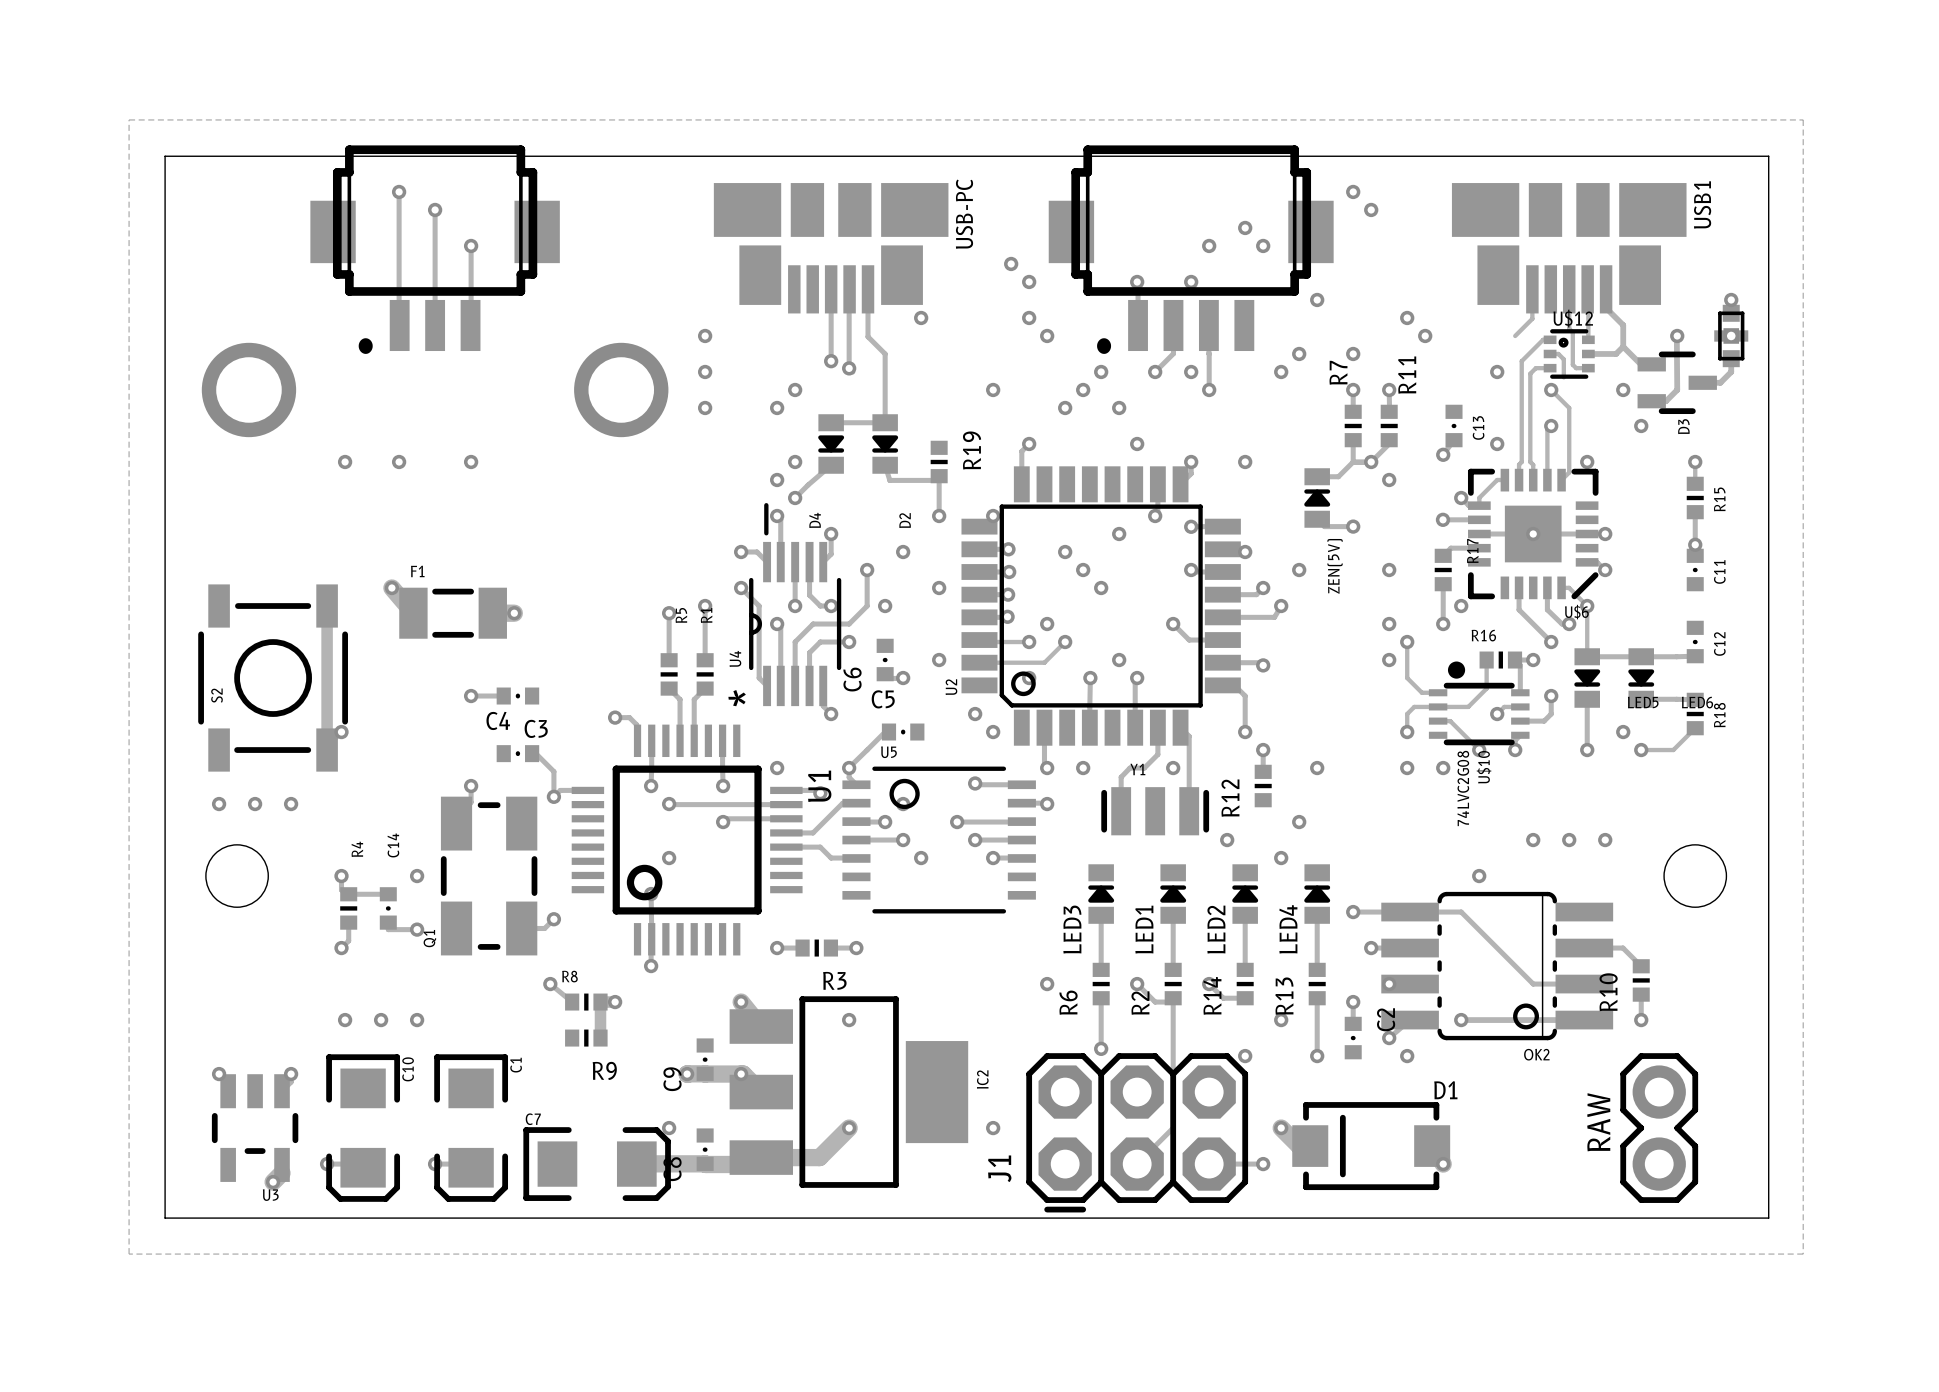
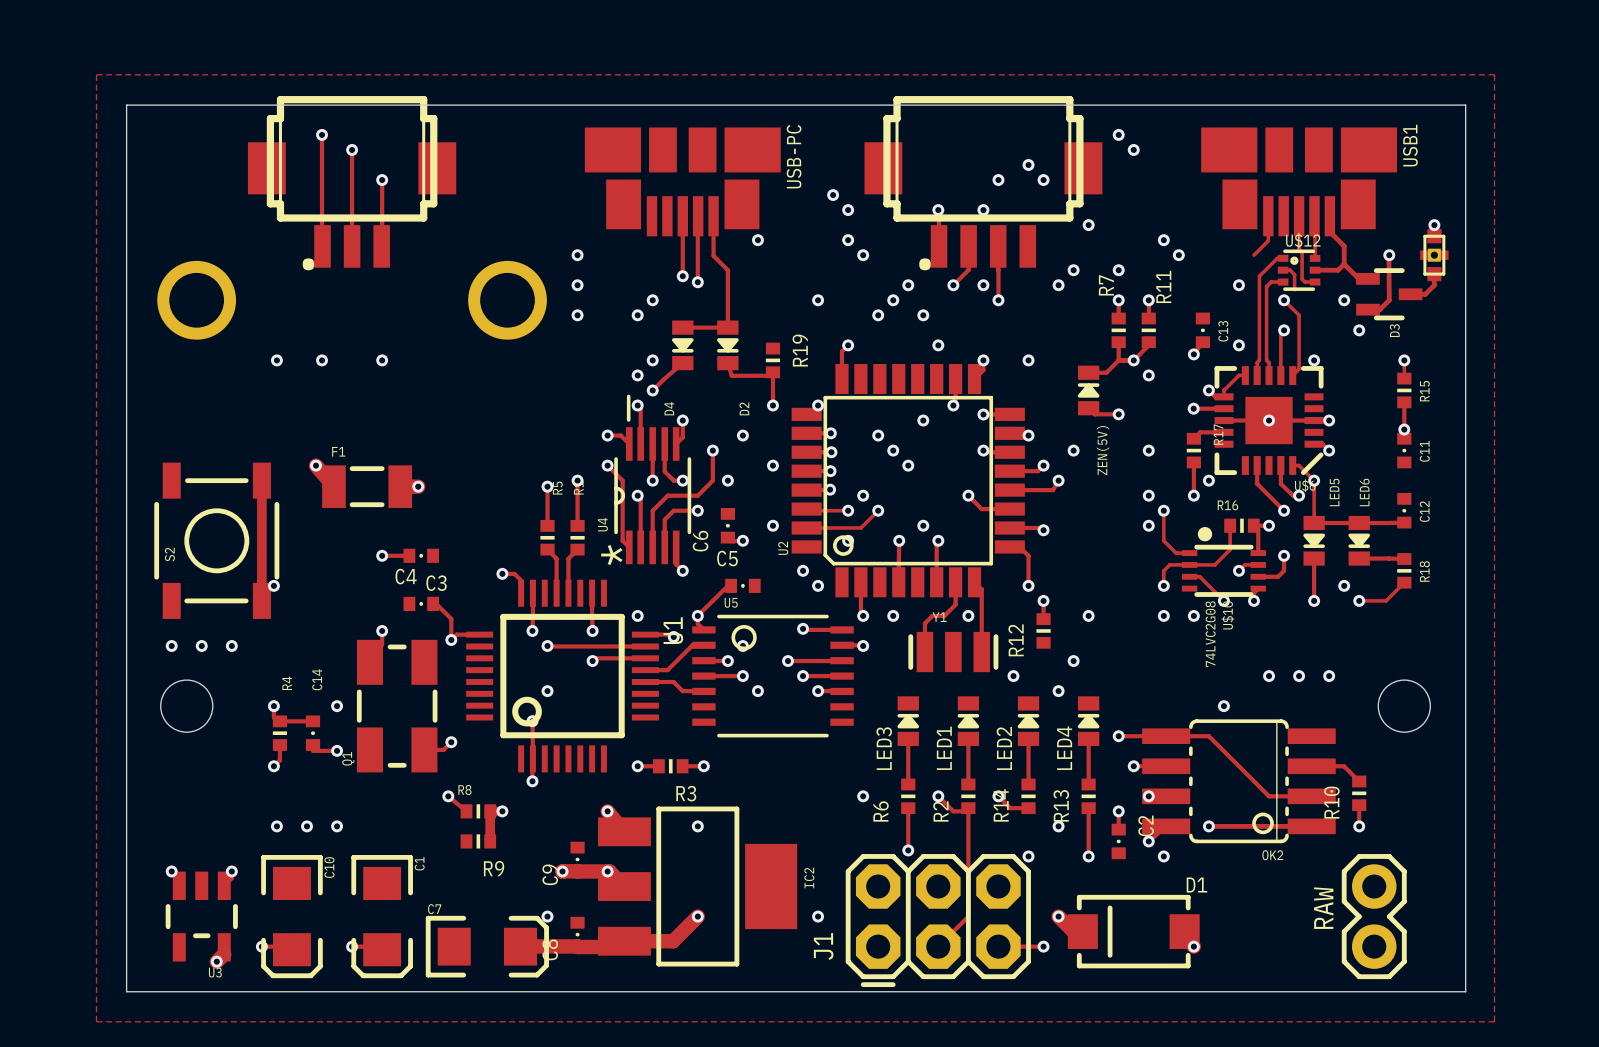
LED5 name rotation: 0° (1643, 702) -> 90° counterclockwise (1334, 492)
LED5 name position: LED5 (1643, 702) -> LED5 (1334, 492)
LED6 name rotation: 0° (1697, 702) -> 90° counterclockwise (1364, 492)
LED6 name position: LED6 (1697, 702) -> LED6 (1364, 492)

